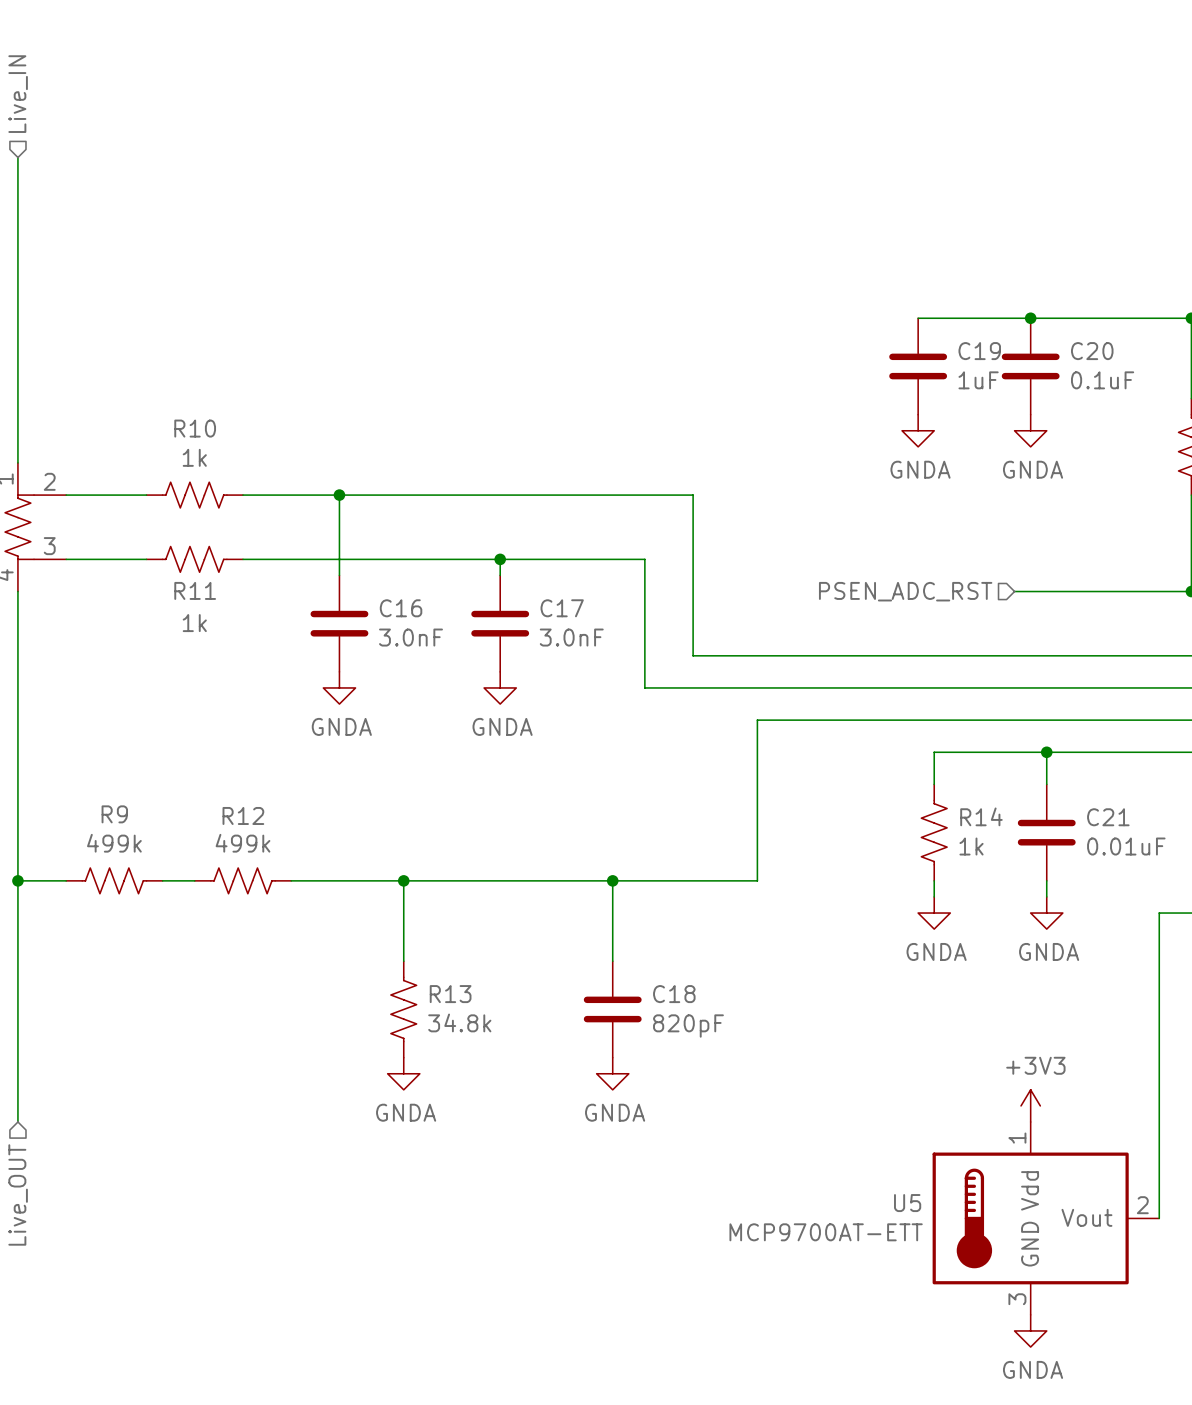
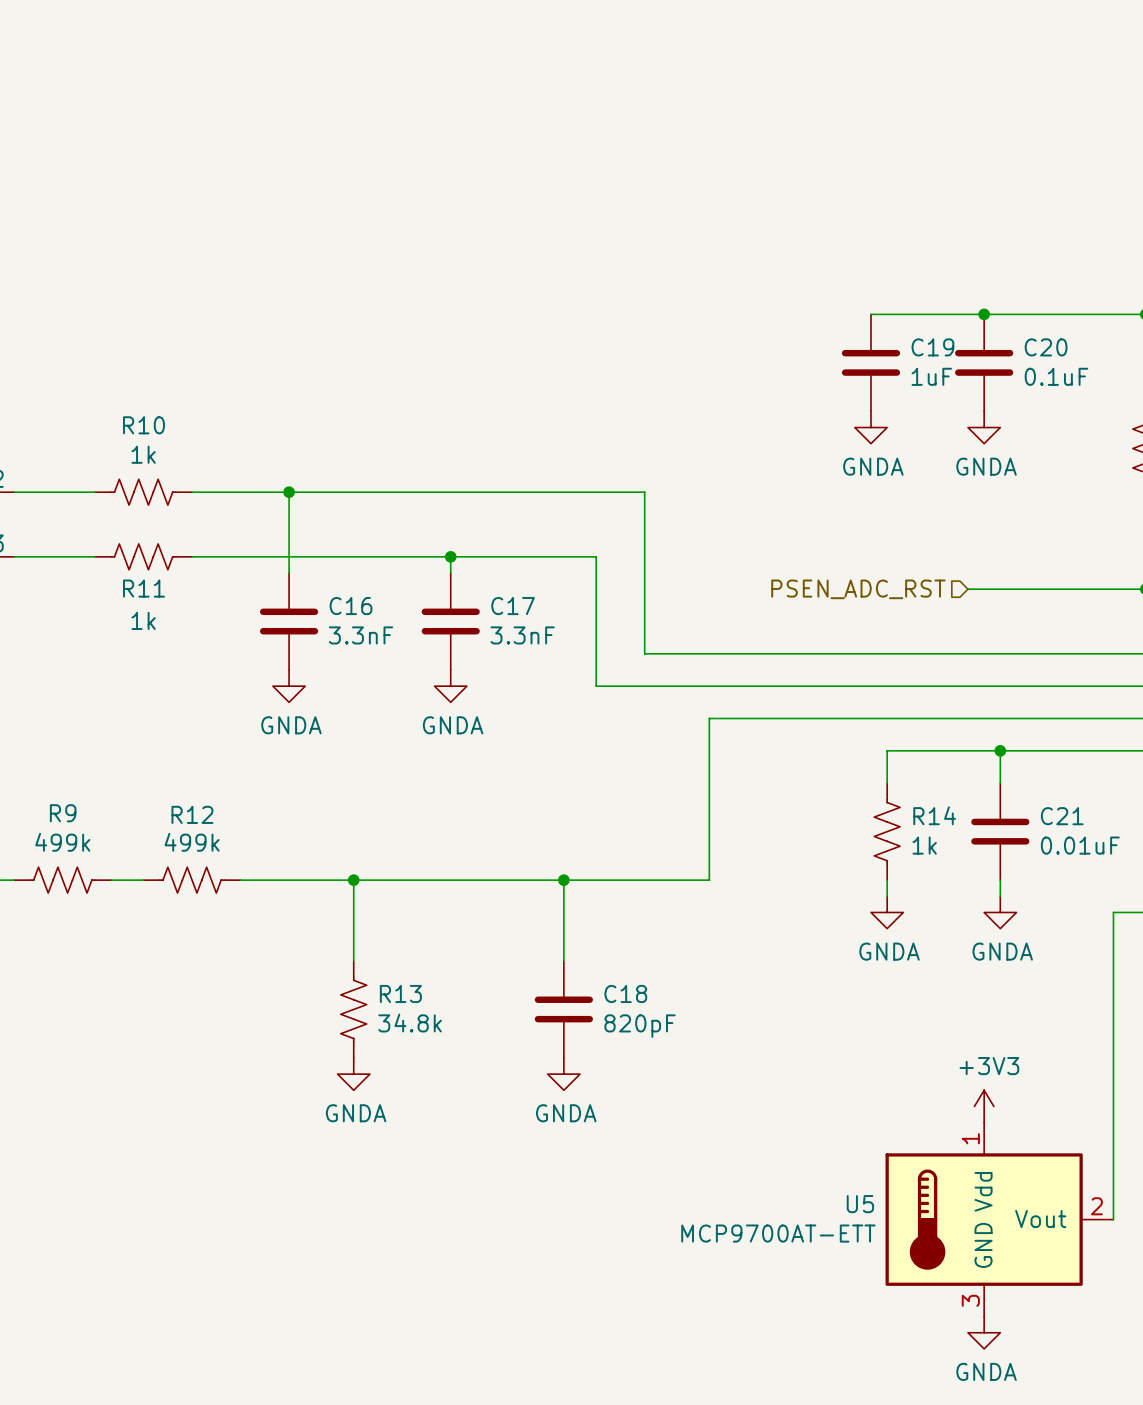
C16 value: 3.0nF (410, 637) -> 3.3nF (361, 635)
C17 value: 3.0nF (571, 637) -> 3.3nF (522, 635)

